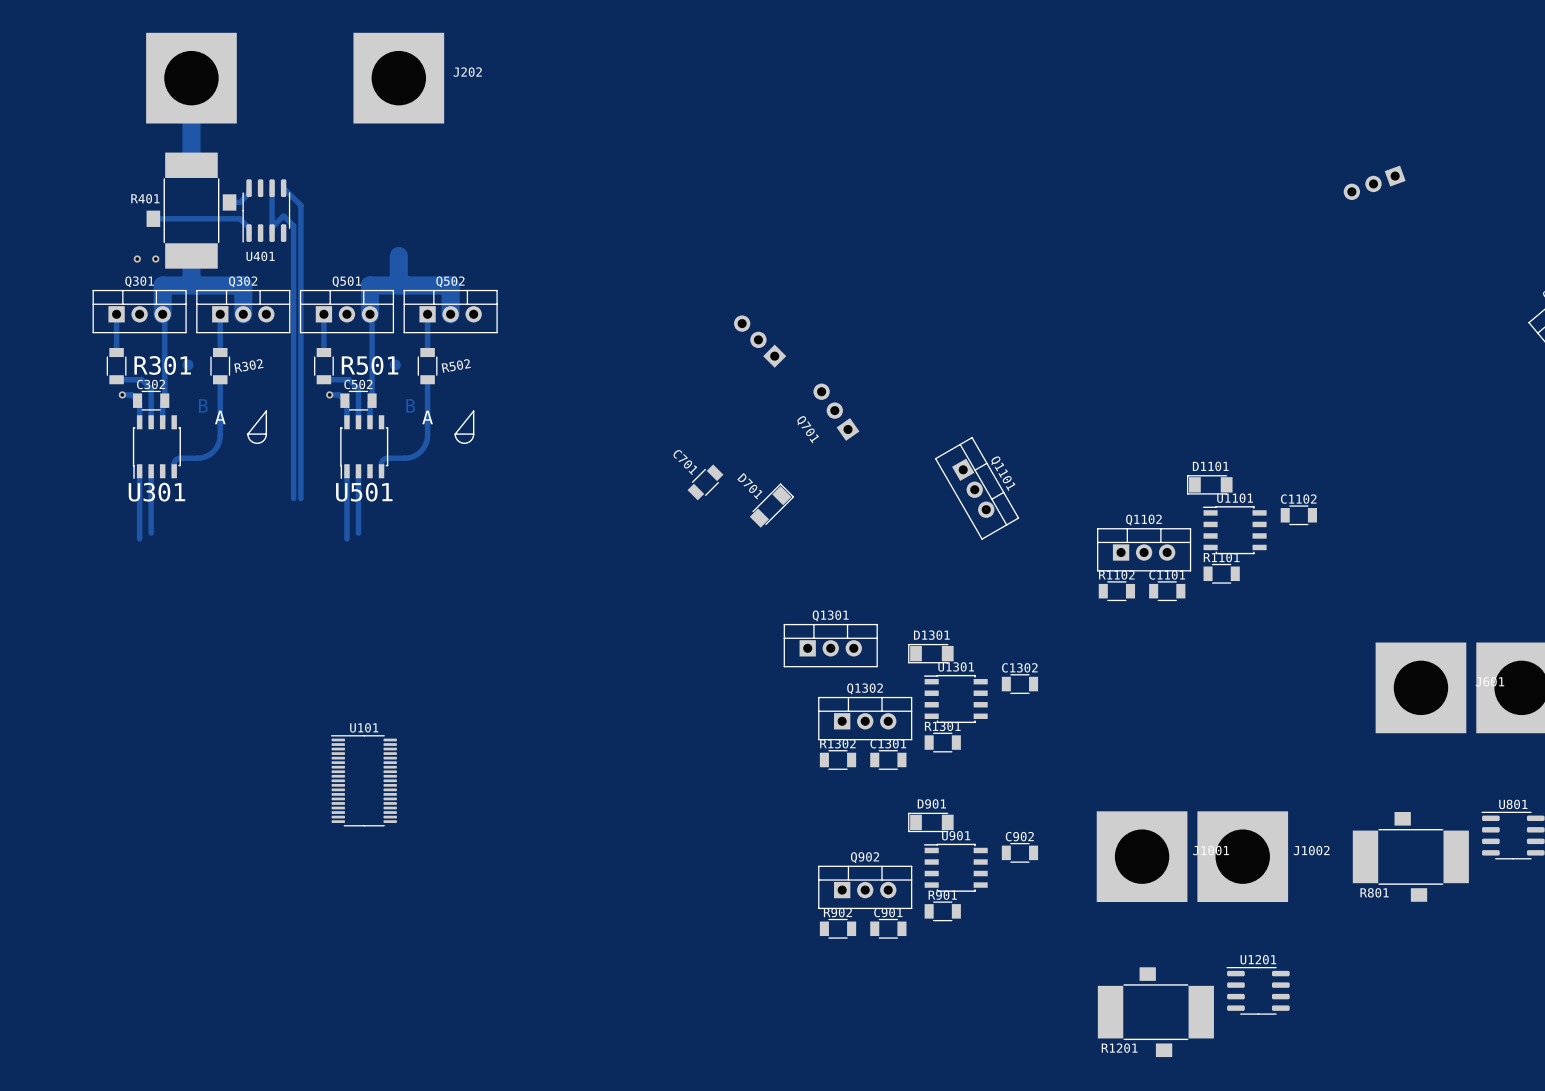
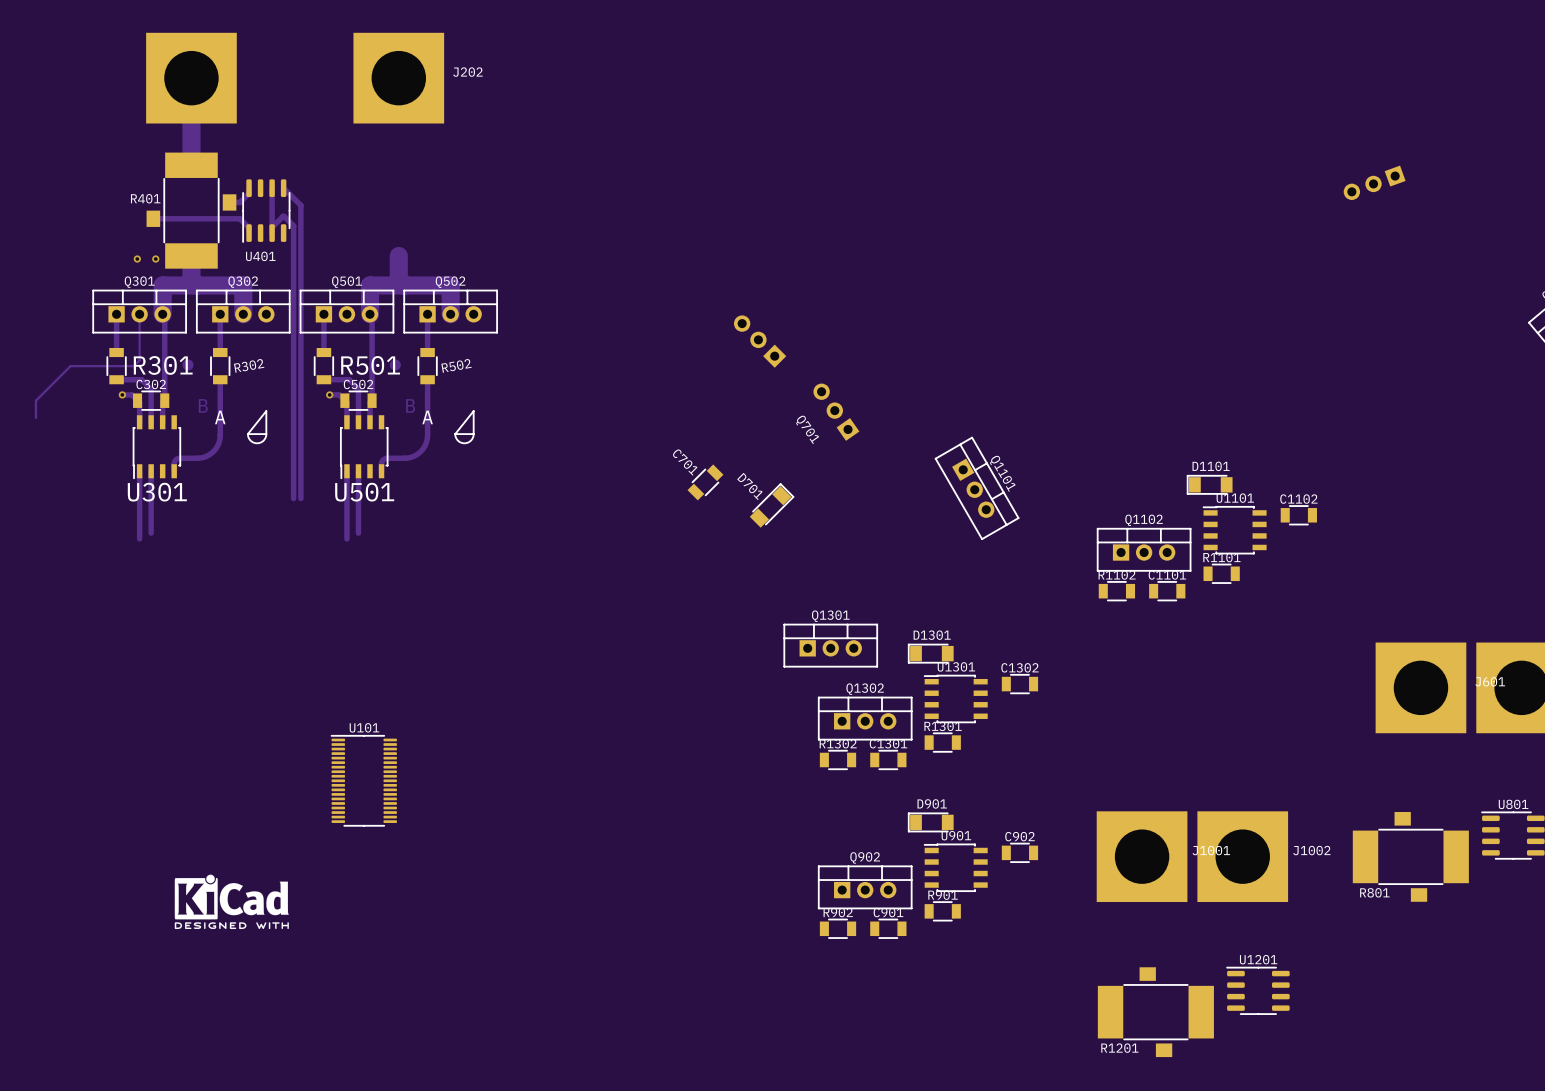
track: none -> (139, 314) (139, 360) (133, 366) (70, 366) (35, 400) (35, 417)
drawing: none -> [174, 874, 289, 930]

